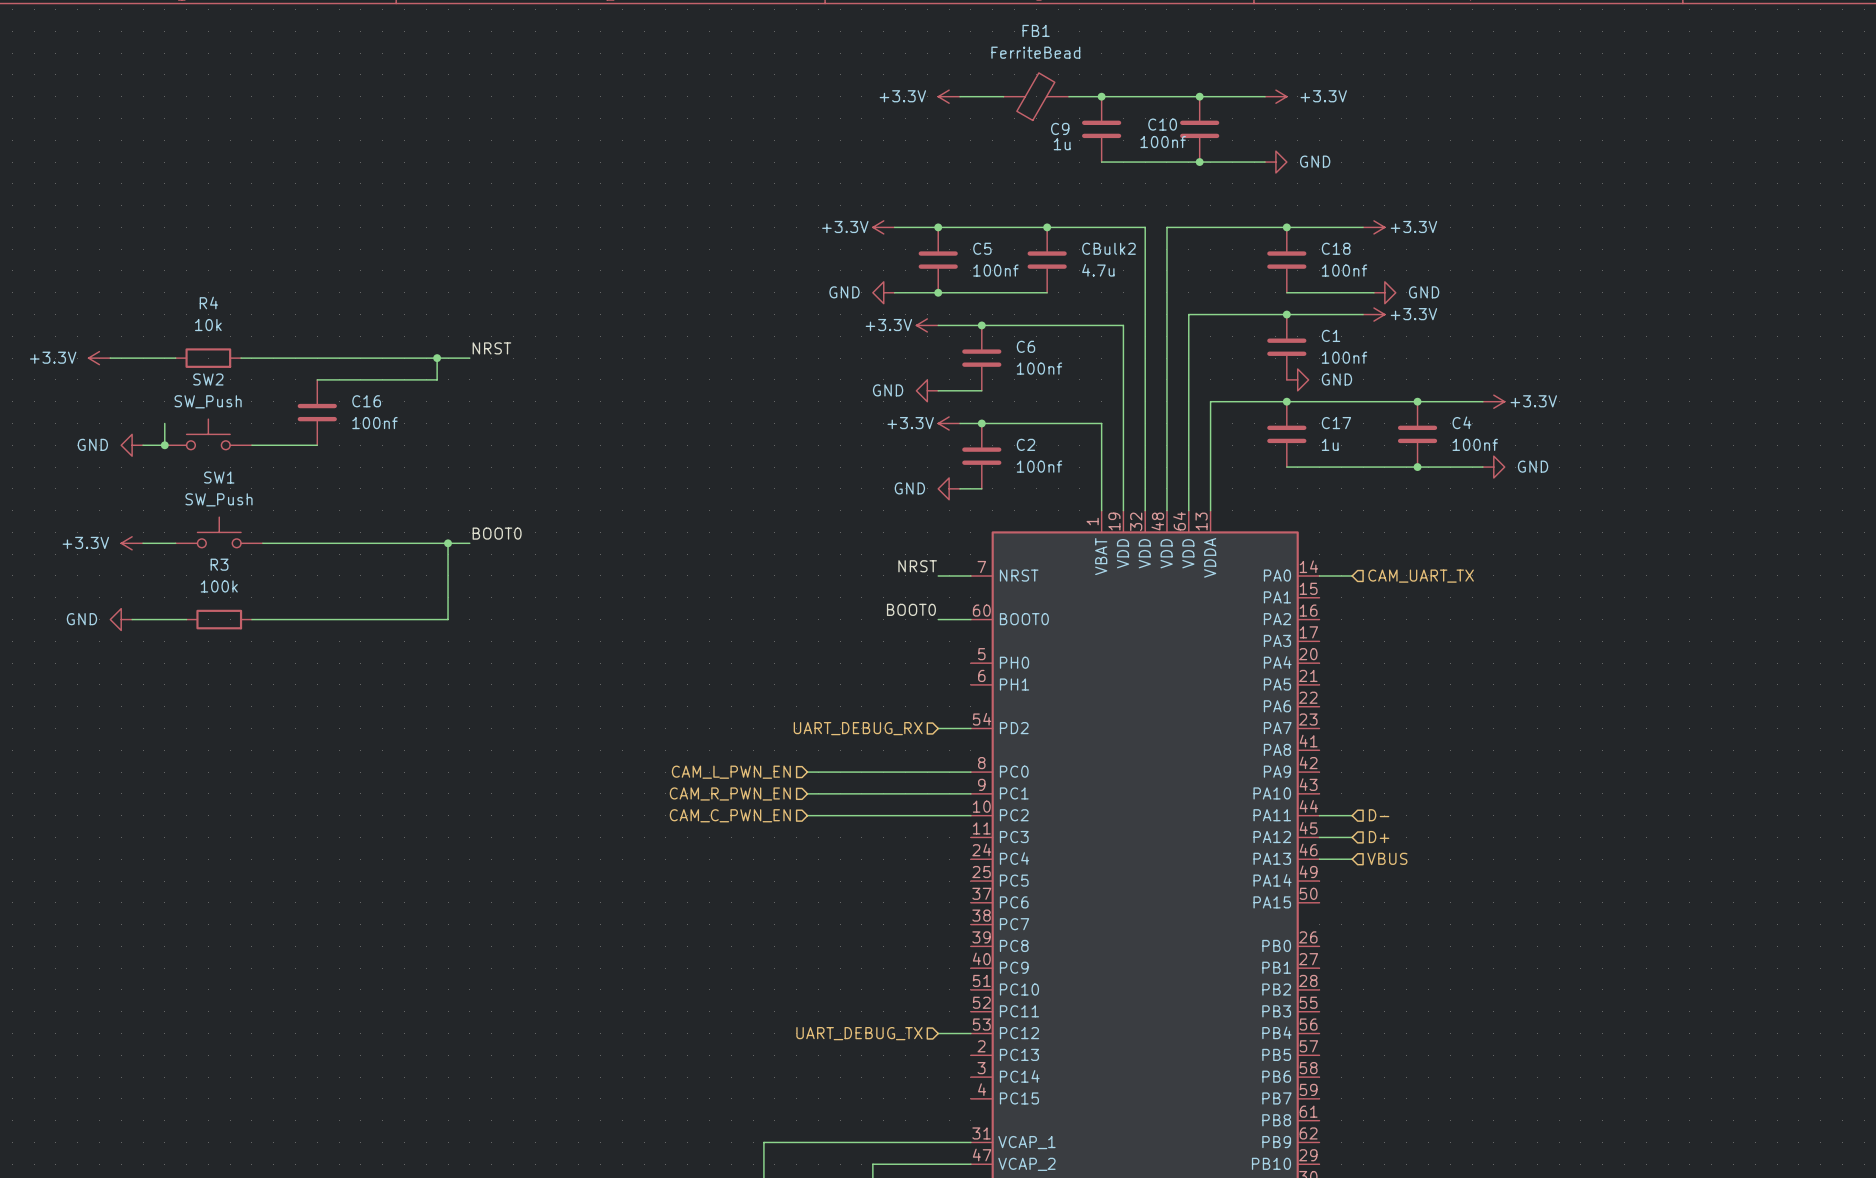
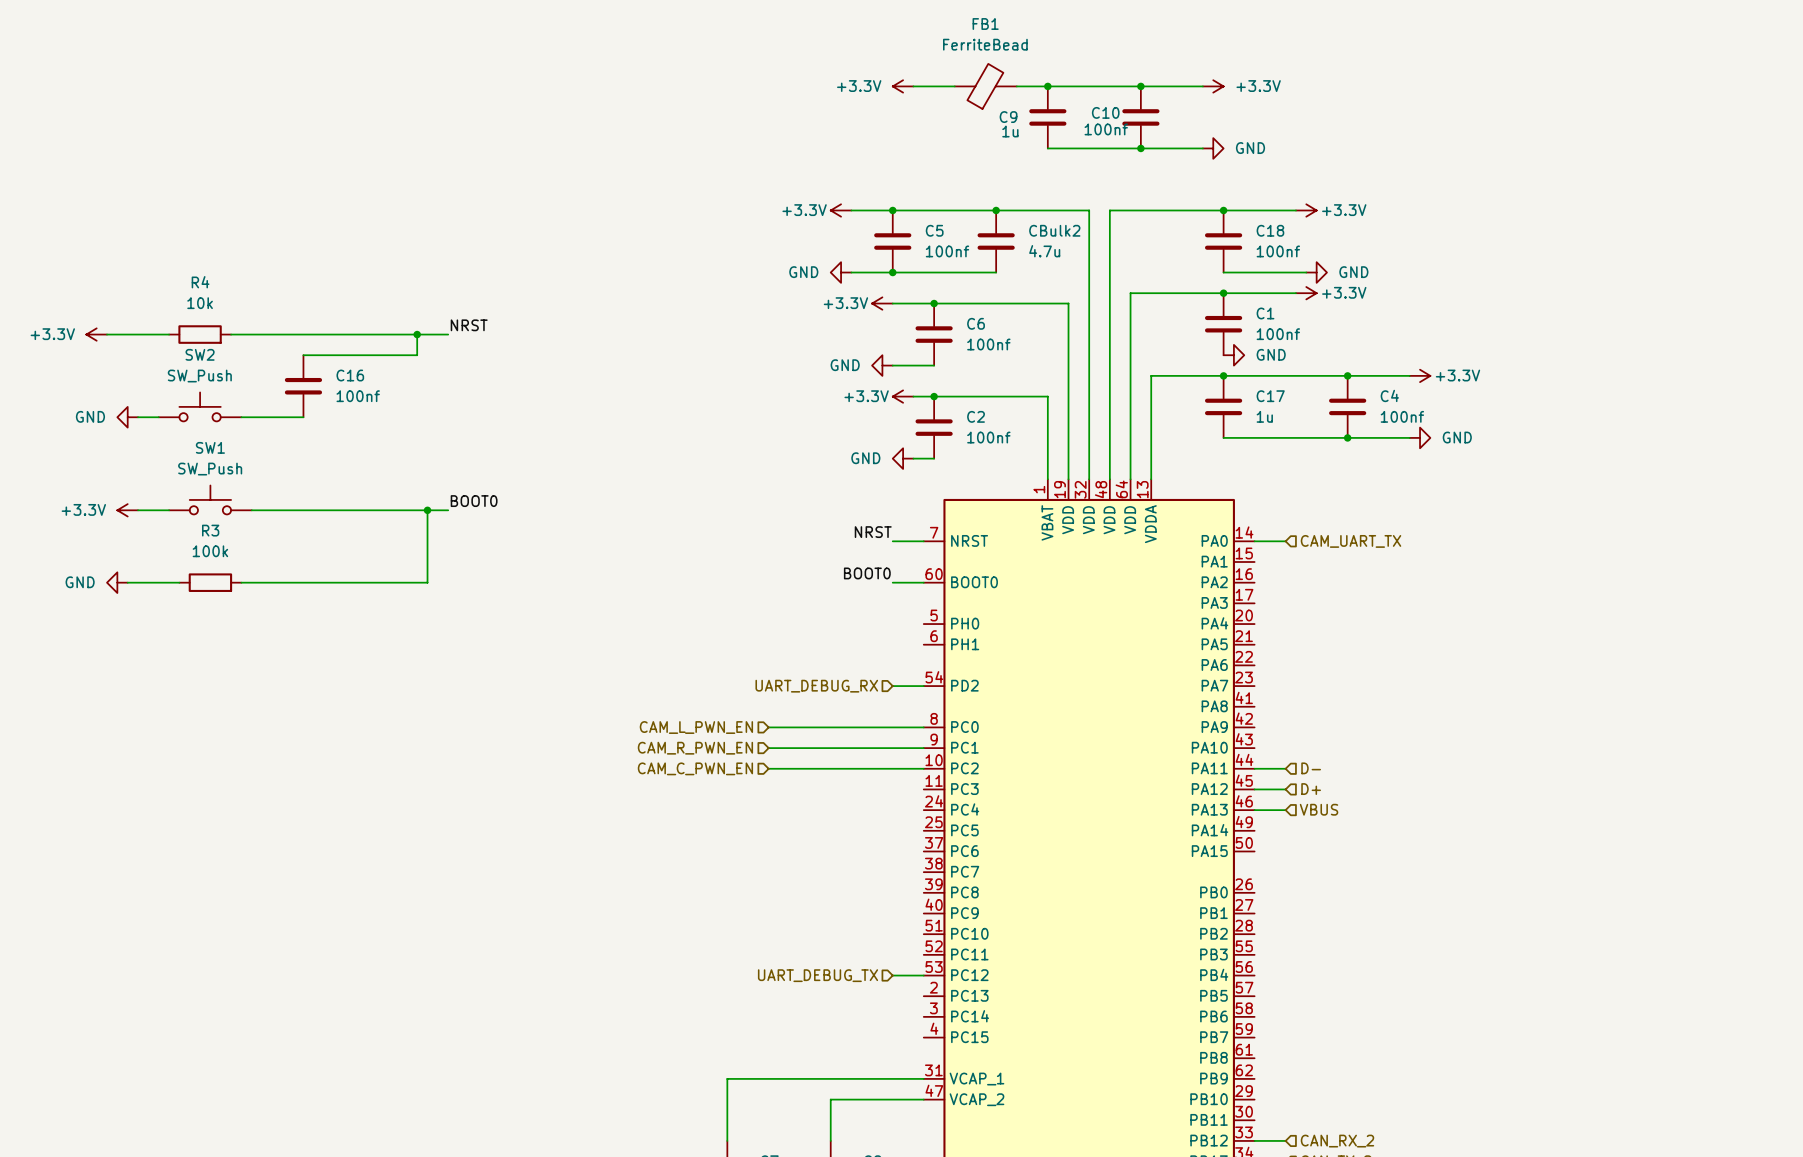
wire: (164, 423) (164, 445) -> none
junction: (164, 445) -> none

